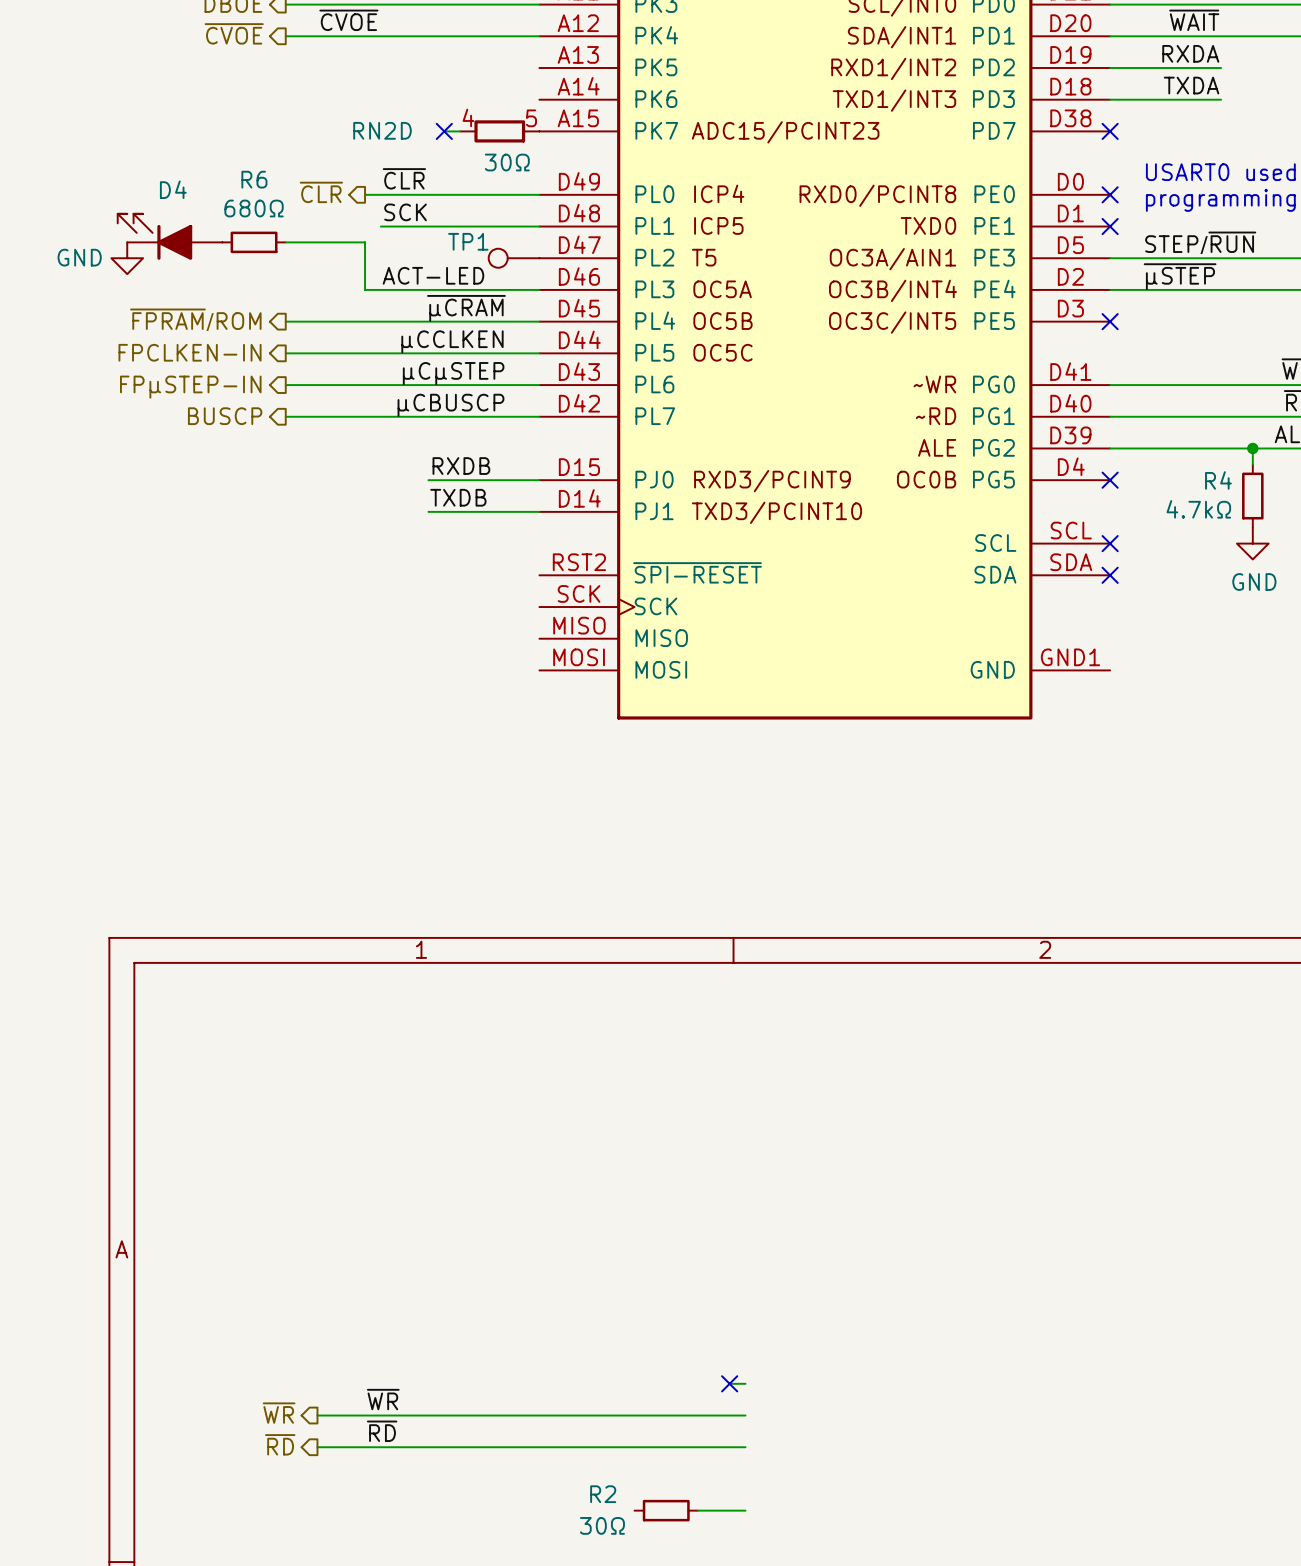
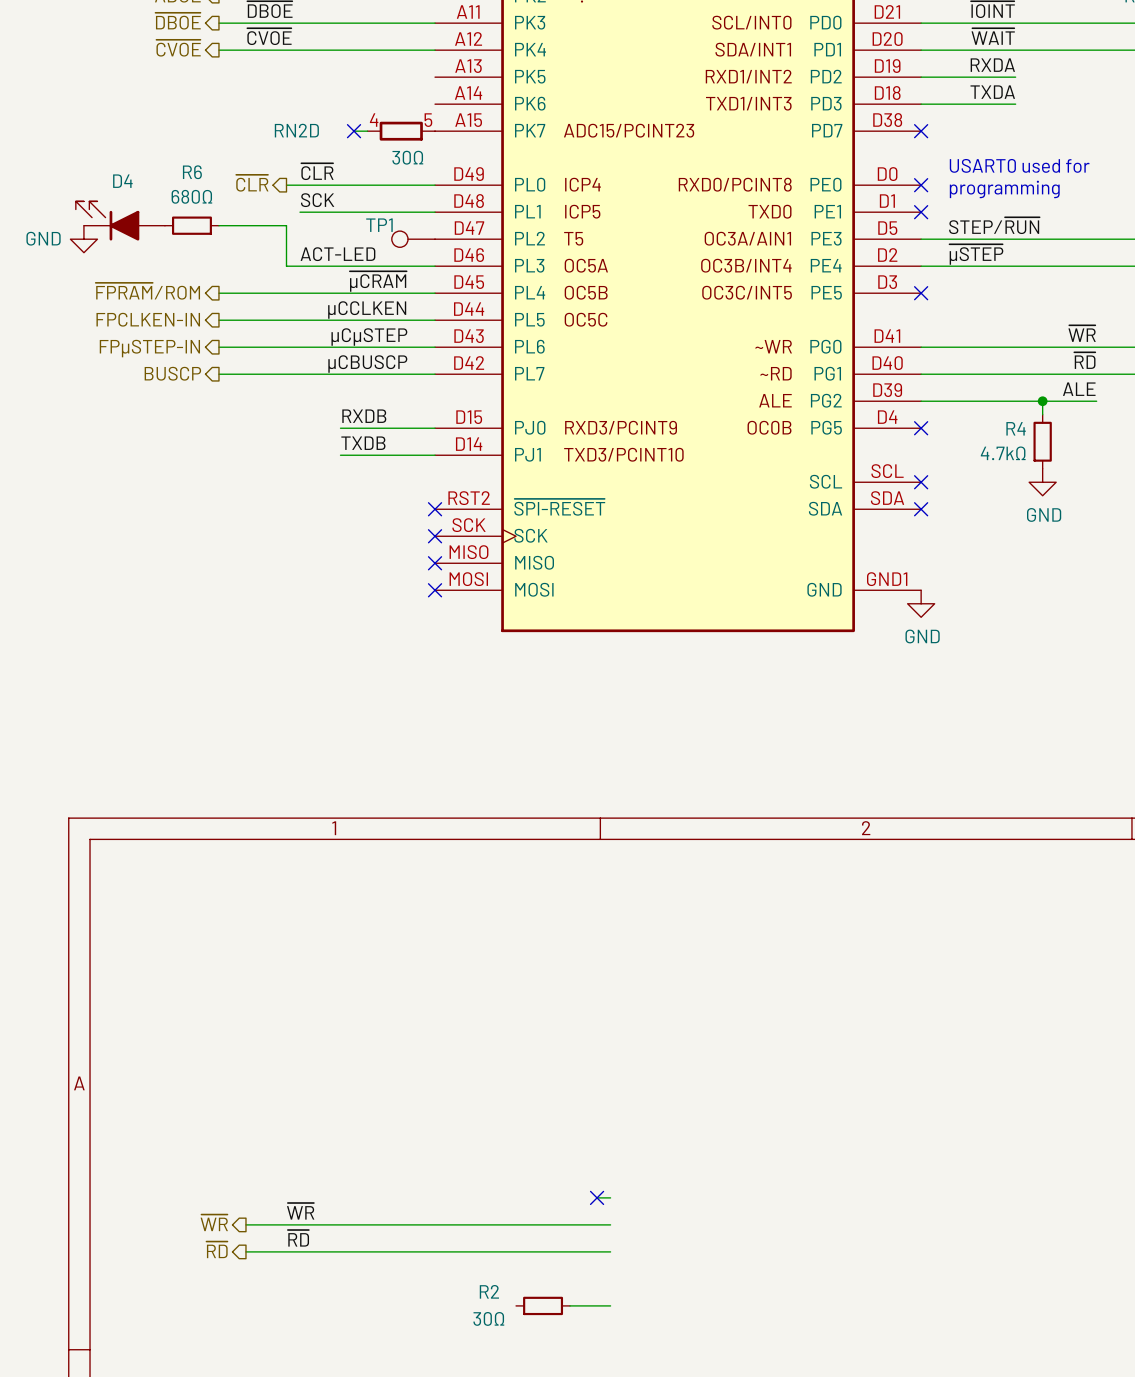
no-connect mark: none -> (435, 509)
no-connect mark: none -> (435, 536)
no-connect mark: none -> (435, 563)
no-connect mark: none -> (435, 590)
power symbol: none -> GND (921, 603)

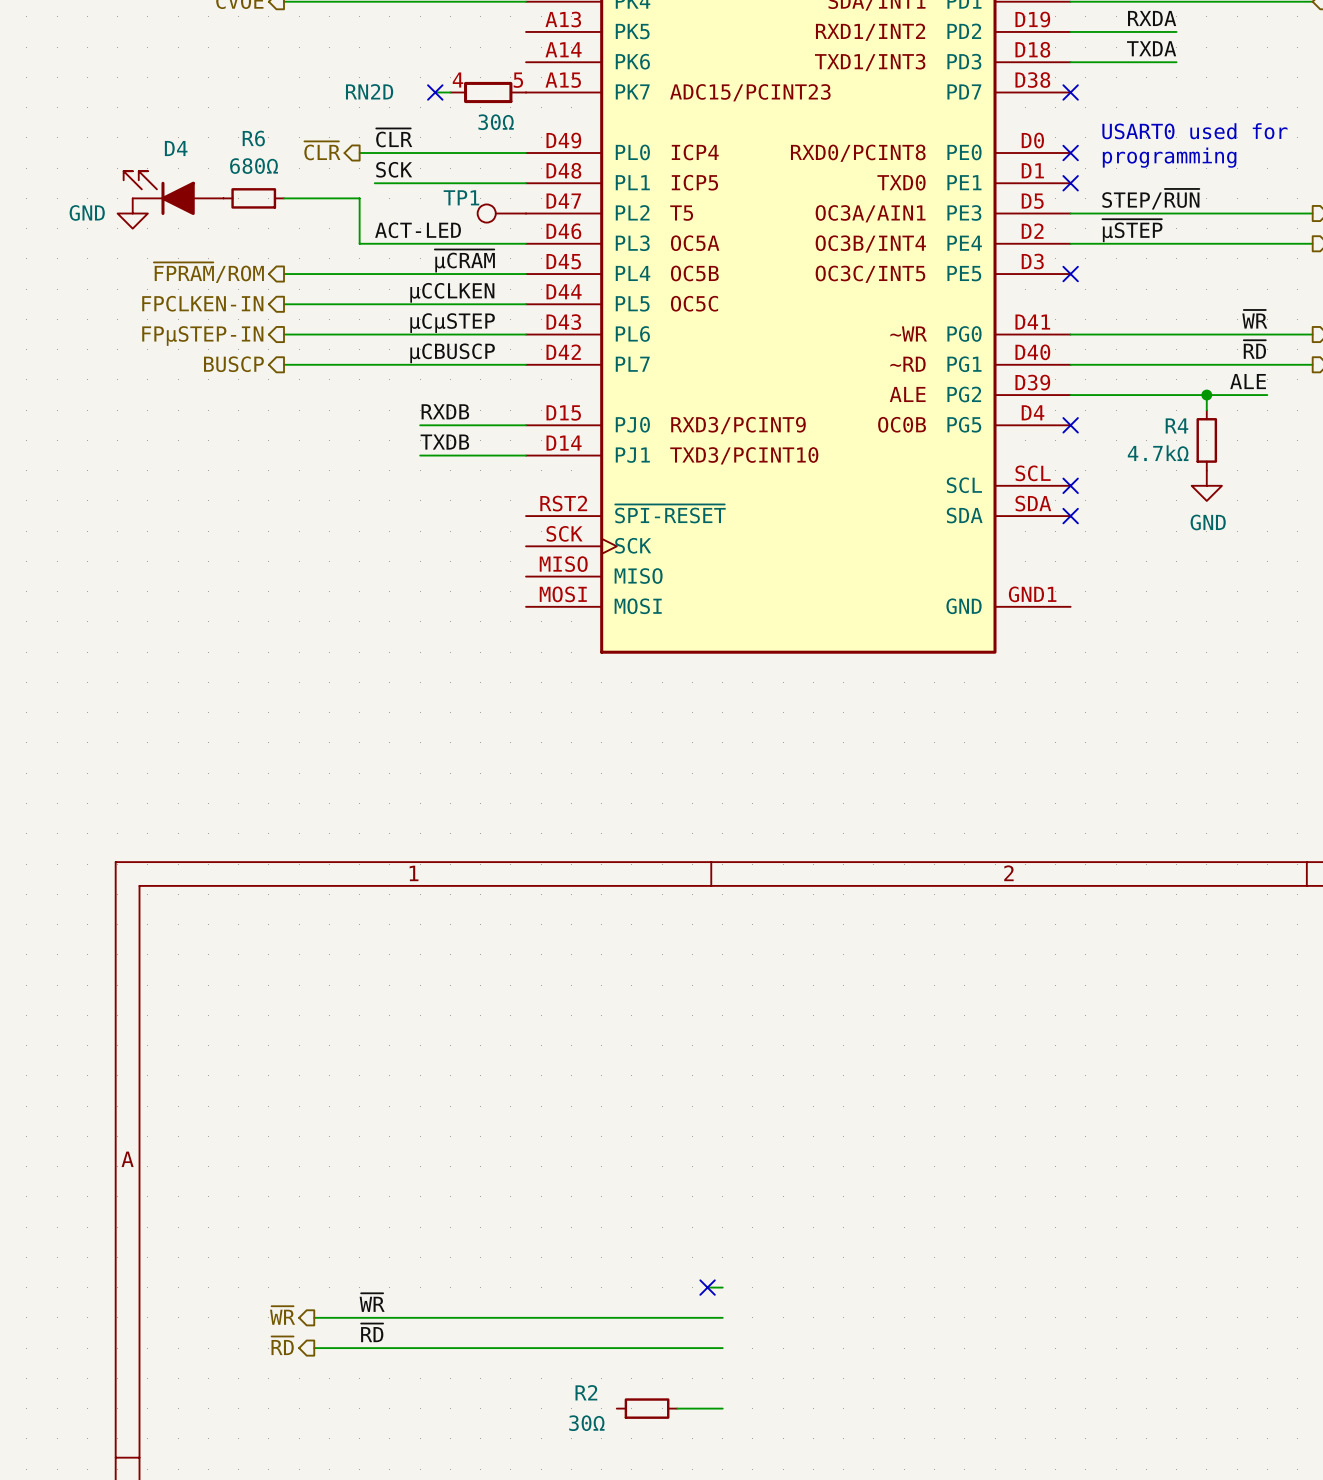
no-connect mark: (435, 509) -> none
no-connect mark: (435, 536) -> none
no-connect mark: (435, 563) -> none
no-connect mark: (435, 590) -> none
power symbol: GND (921, 603) -> none

